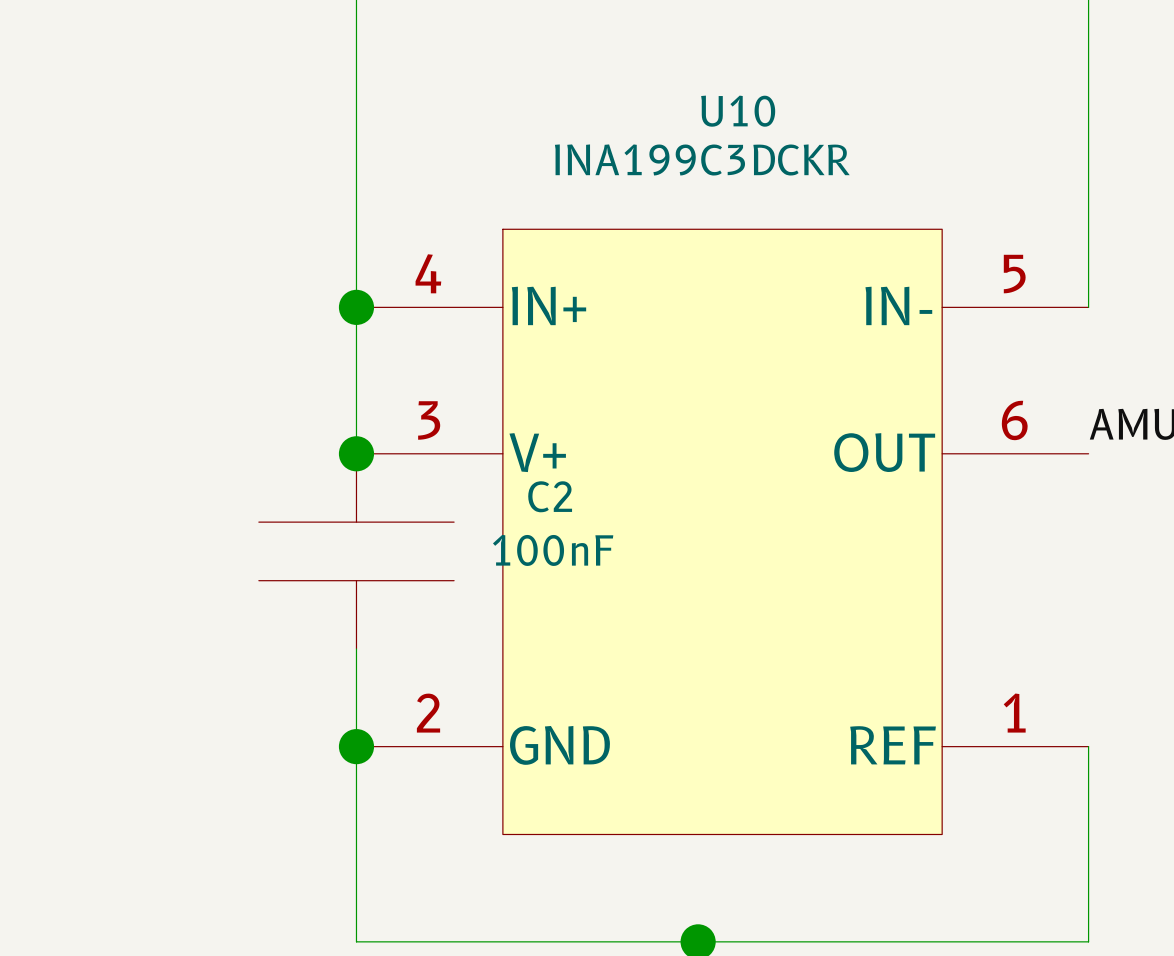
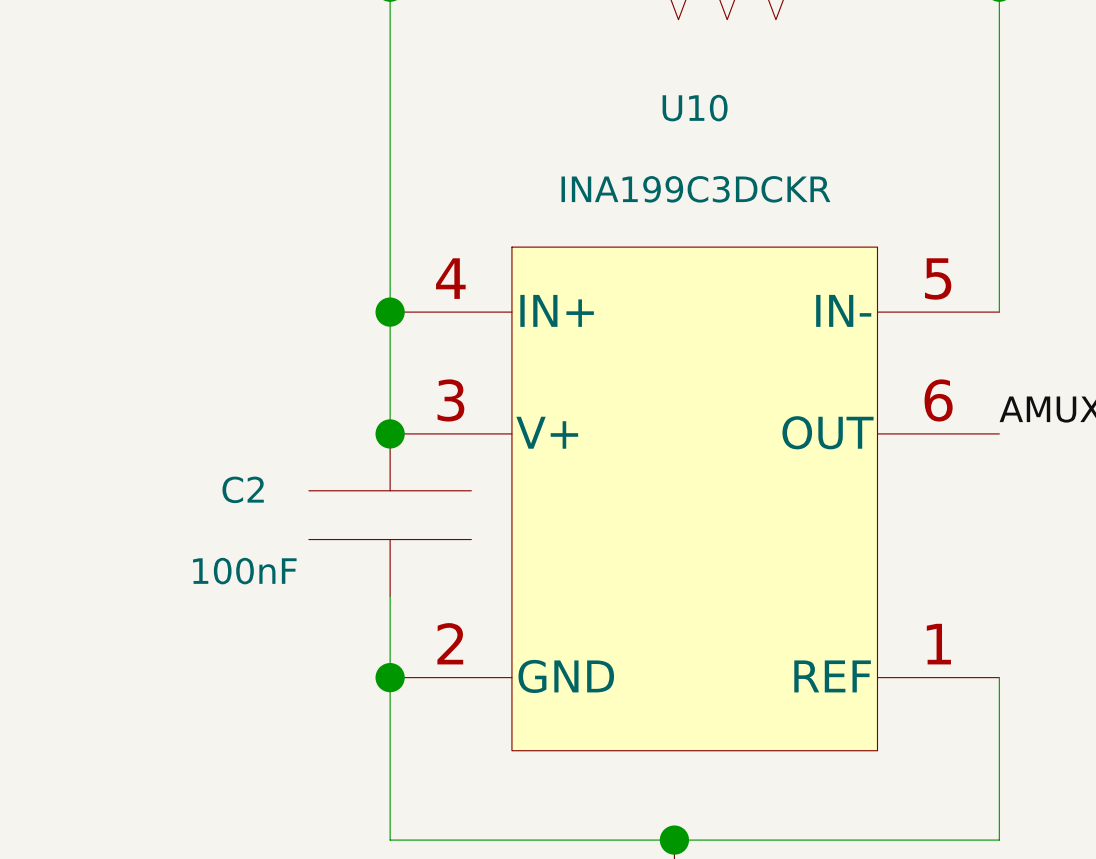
U10 symbol: [356, 229, 1089, 835] -> [390, 247, 1000, 751]
C2 name position: C2 (550, 496) -> C2 (243, 489)
C2 value position: 100nF (553, 550) -> 100nF (244, 571)

